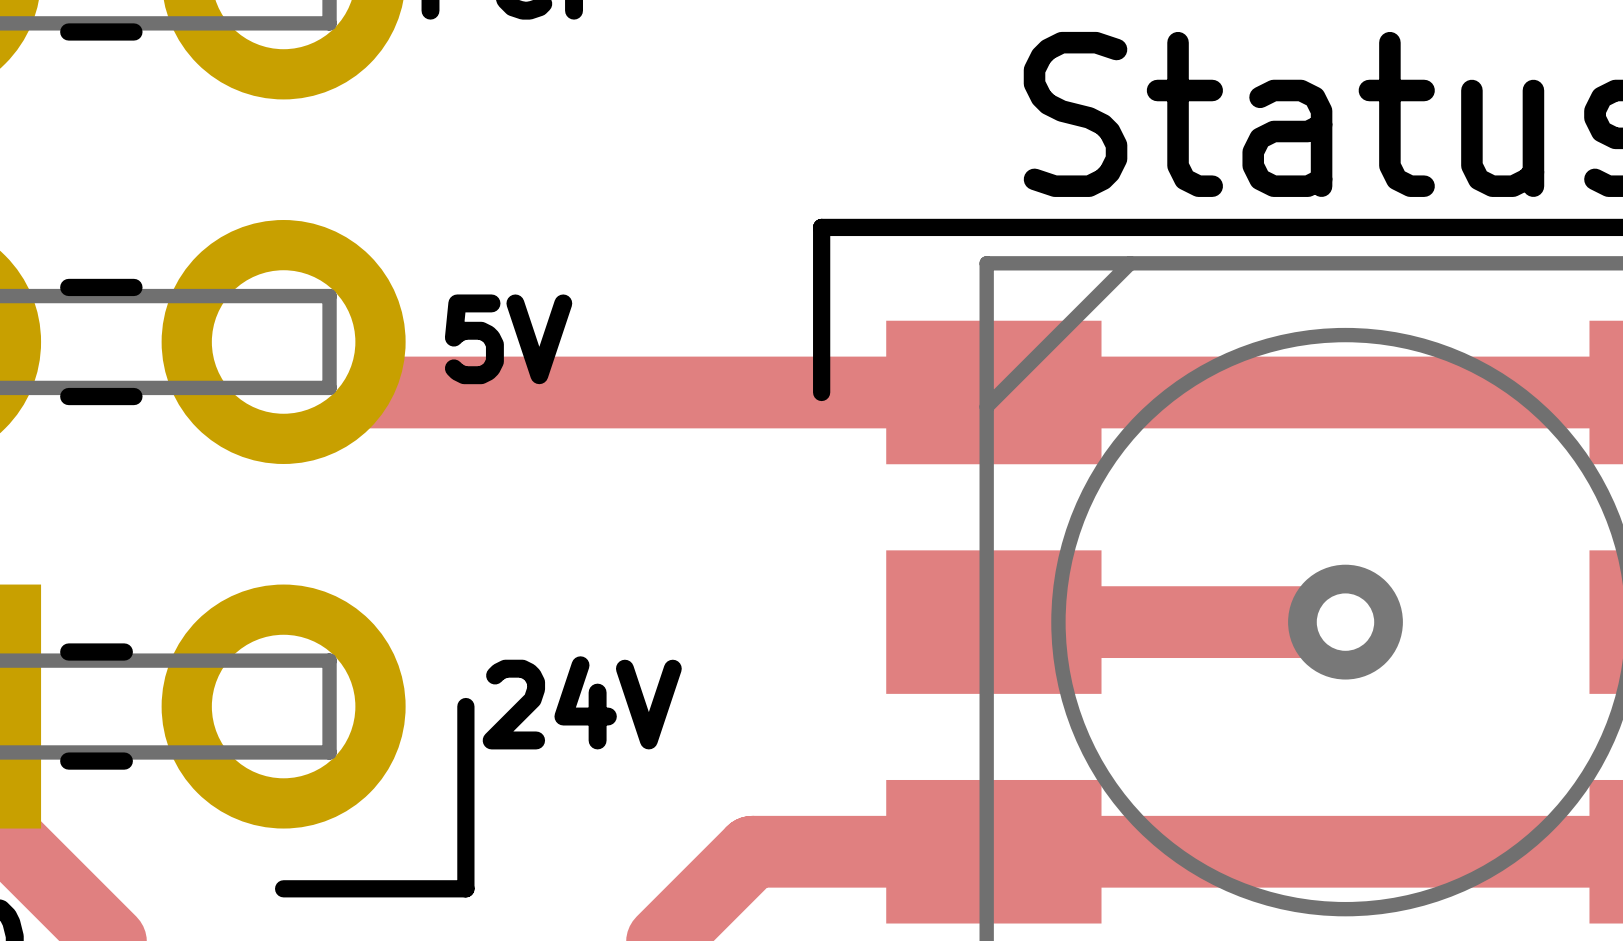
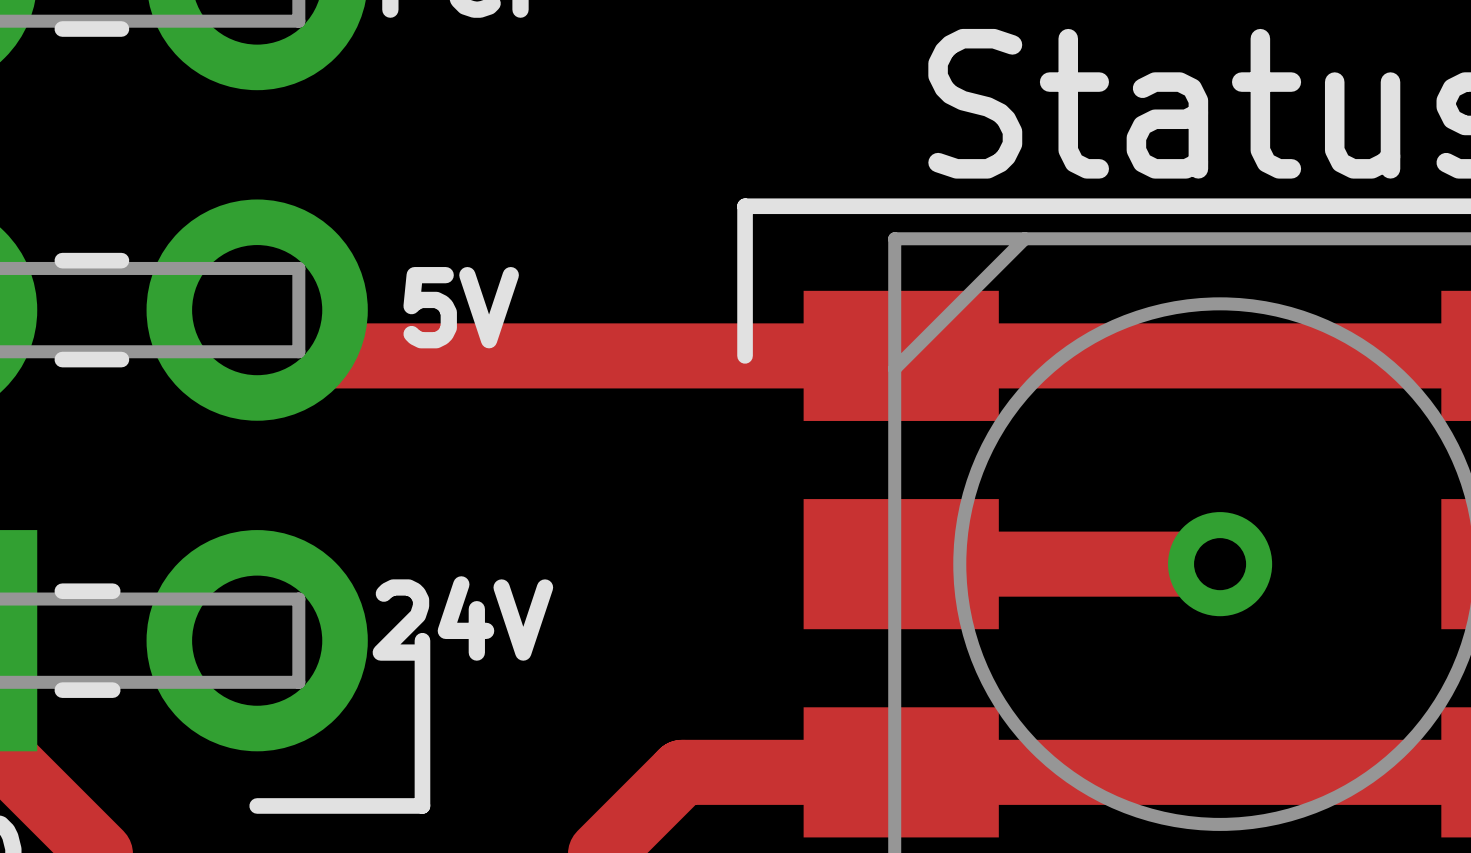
text position: 24V (582, 702) -> 24V (462, 618)

